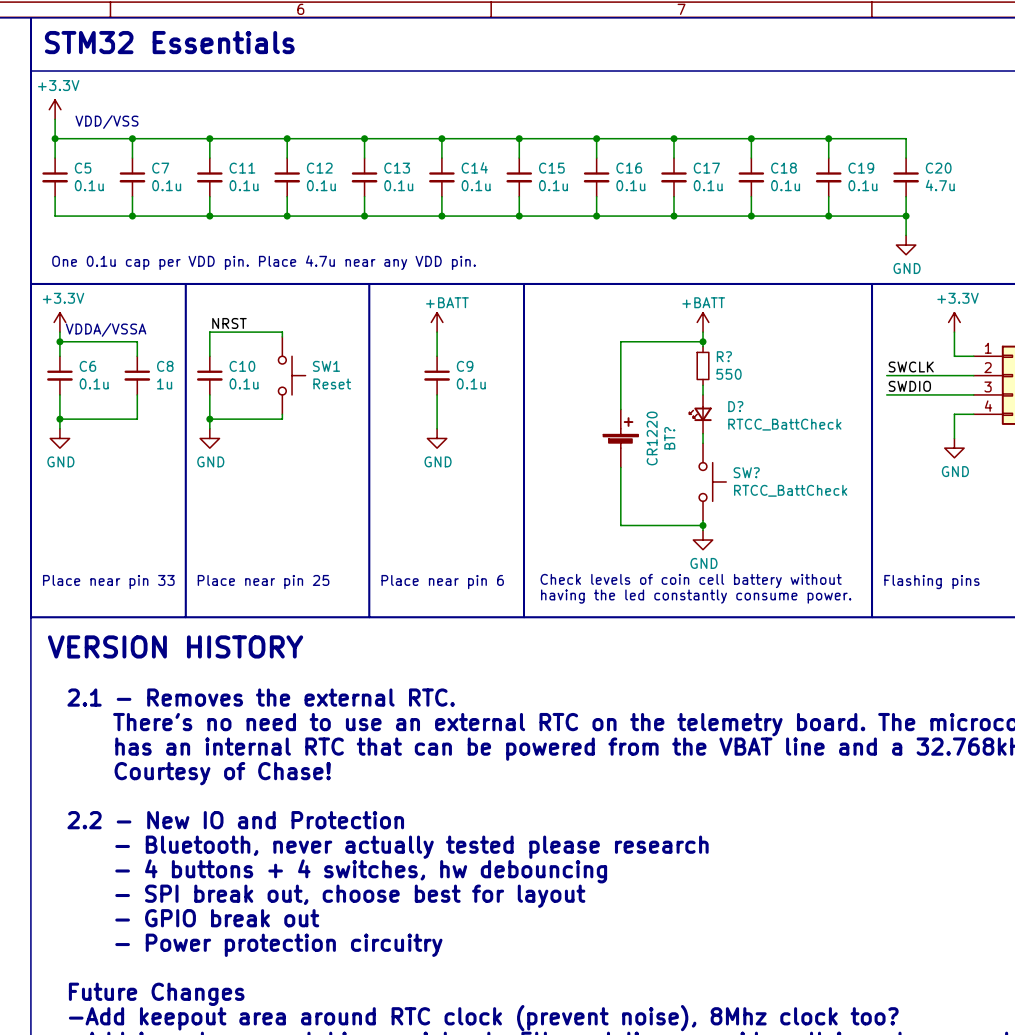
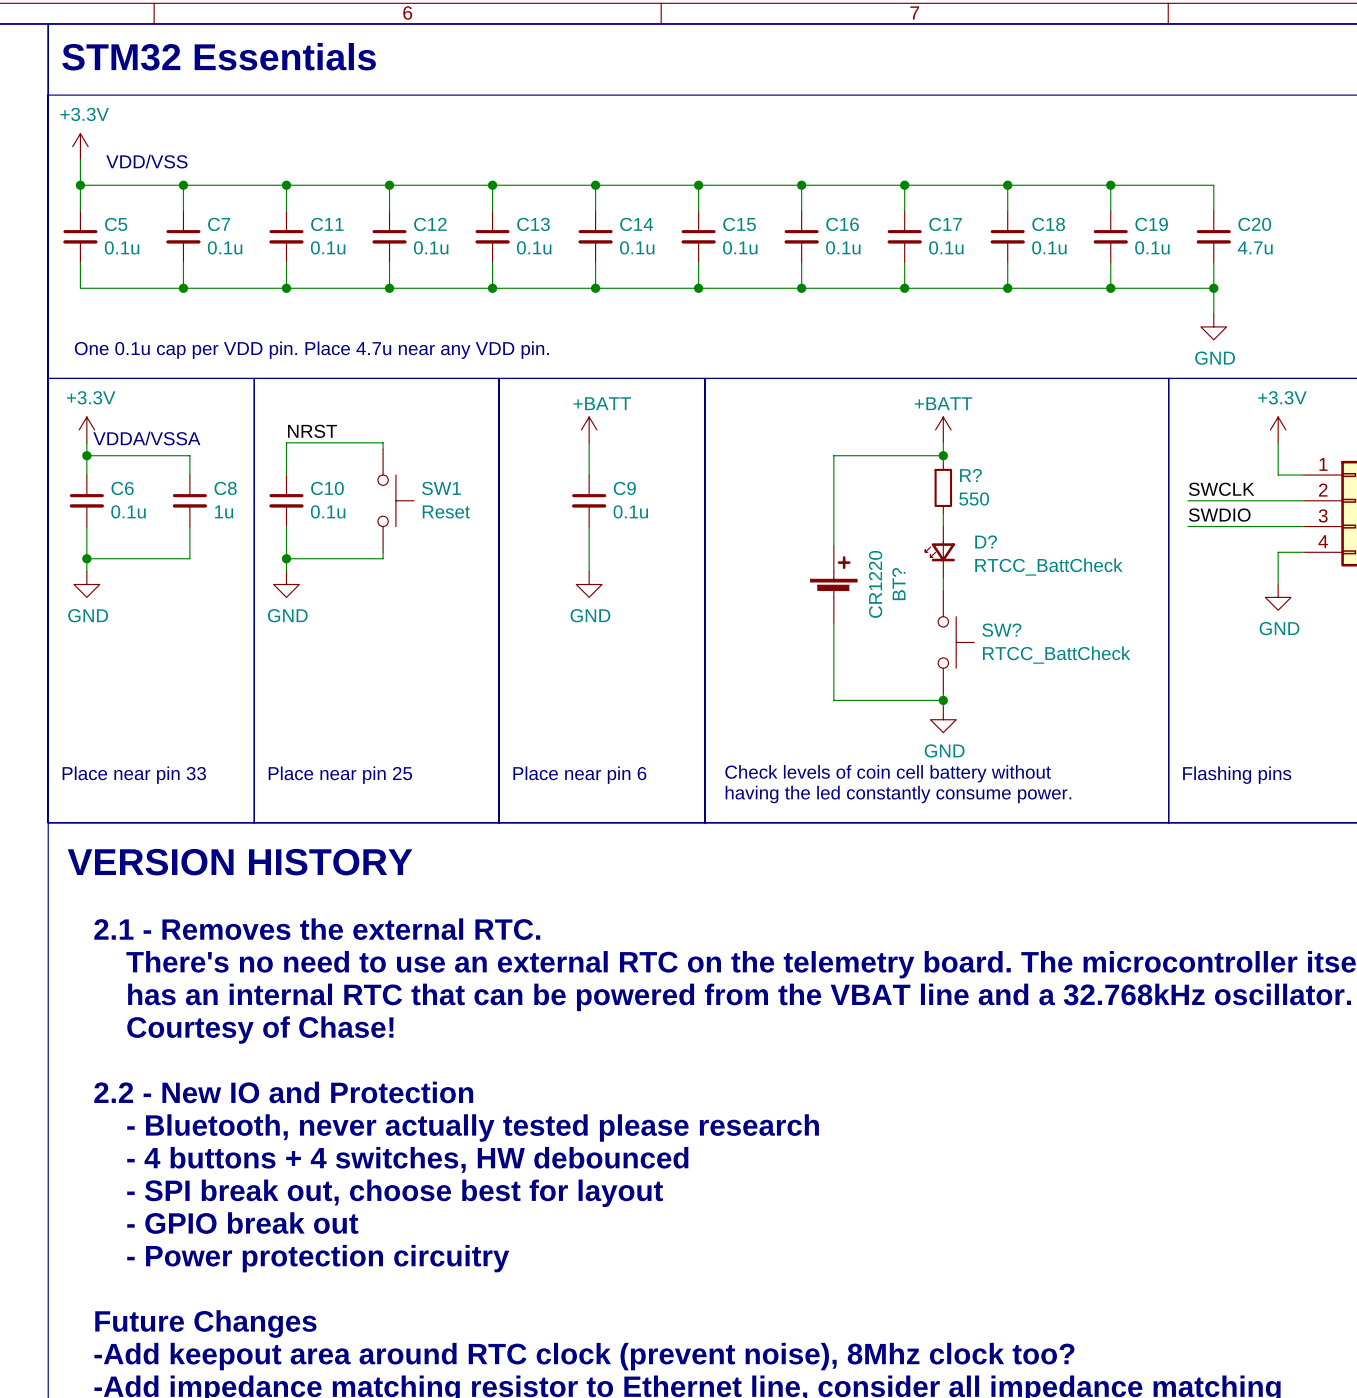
text: - 4 buttons + 4 switches, hw debouncing (361, 871) -> - 4 buttons + 4 switches, HW debounced (407, 1159)

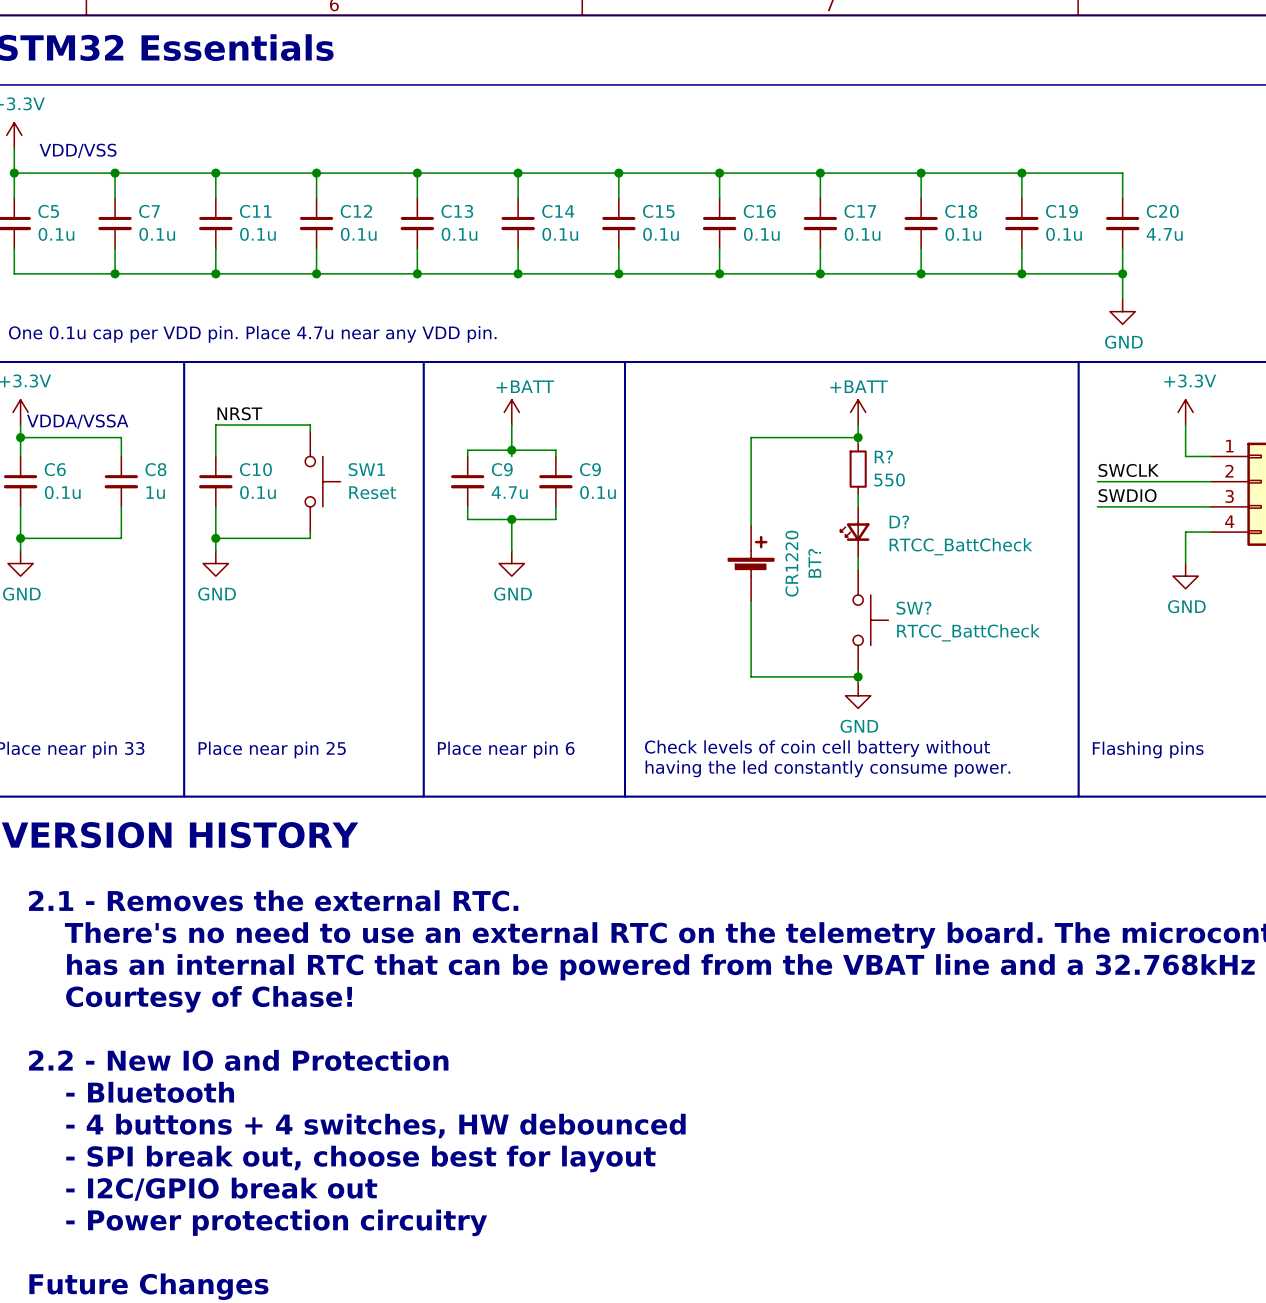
junction: none -> (511, 450)
wire: none -> (467, 456) (467, 450) (555, 450) (555, 456)
C9: none -> 4.7u (467, 481)
C9 position: (589, 500) -> (555, 481)
wire: none -> (467, 506) (467, 519) (555, 519) (555, 506)
wire: (589, 526) (589, 539) -> none
junction: none -> (511, 519)
text: - Bluetooth, never actually tested please research (473, 1128) -> - Bluetooth (150, 1092)
text: - GPIO break out (242, 1223) -> - I2C/GPIO break out (221, 1189)

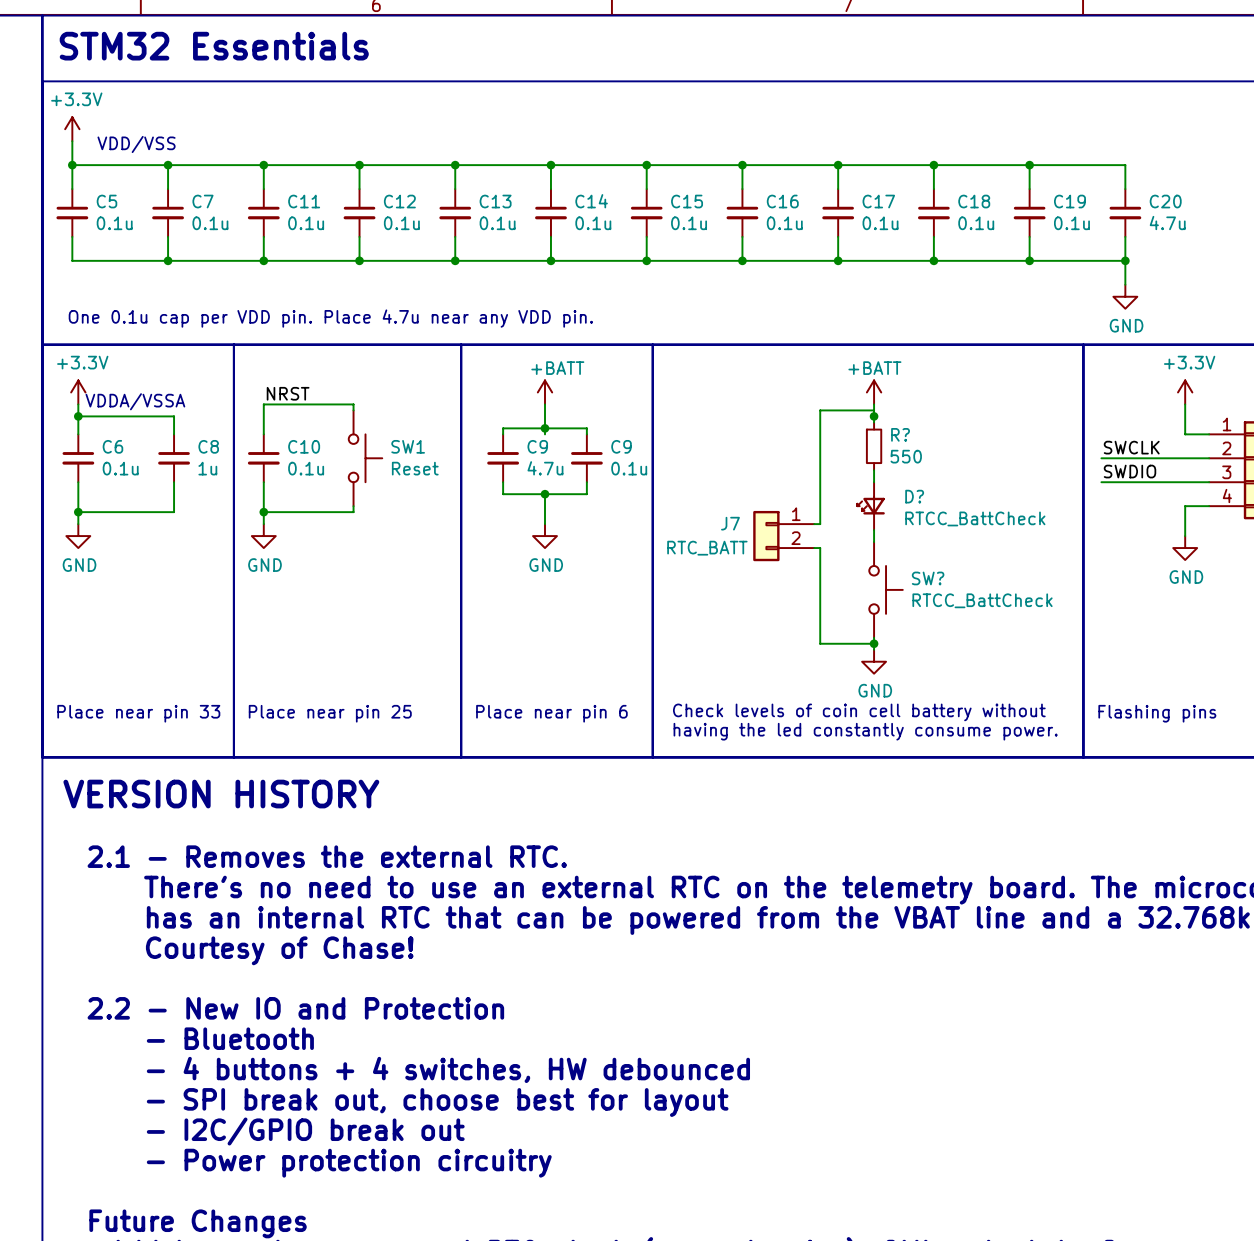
wire: none -> (874, 410) (820, 410) (820, 524) (814, 524)
wire: (858, 437) (751, 437) (751, 525) -> none
BT?: CR1220 (751, 563) -> none
J7: none -> RTC_BATT (783, 536)
wire: (751, 601) (751, 676) (801, 676) -> (814, 548) (820, 548) (820, 643)

